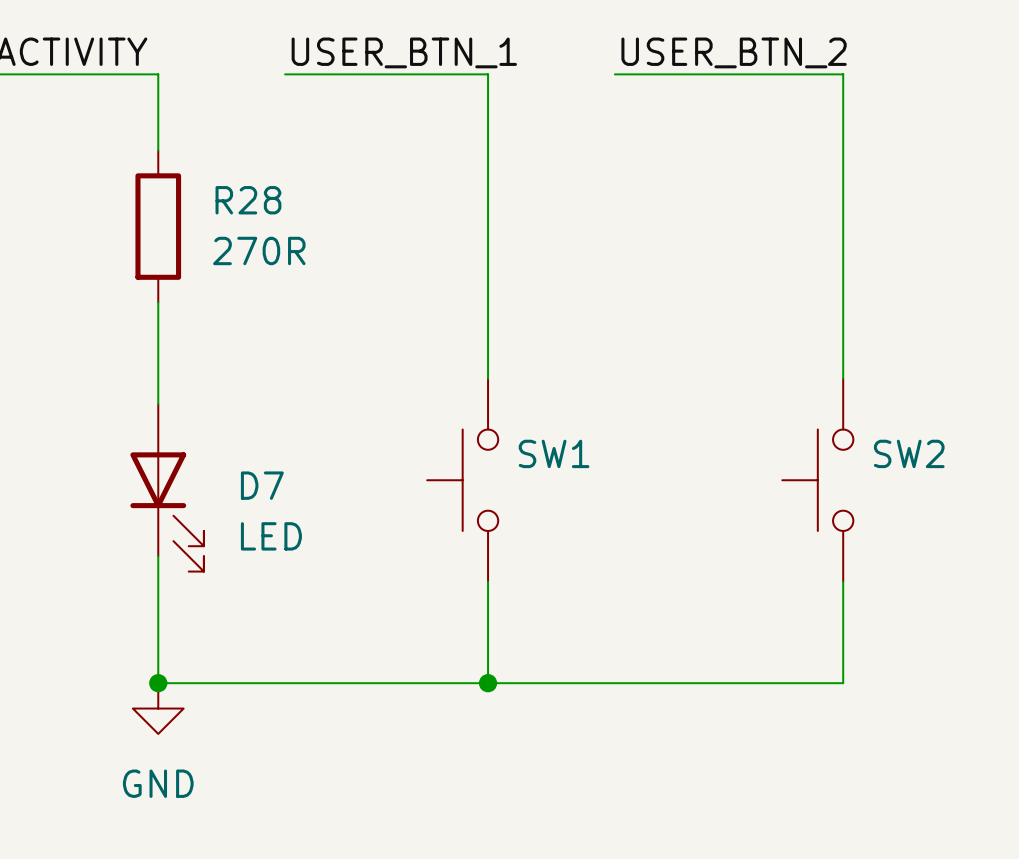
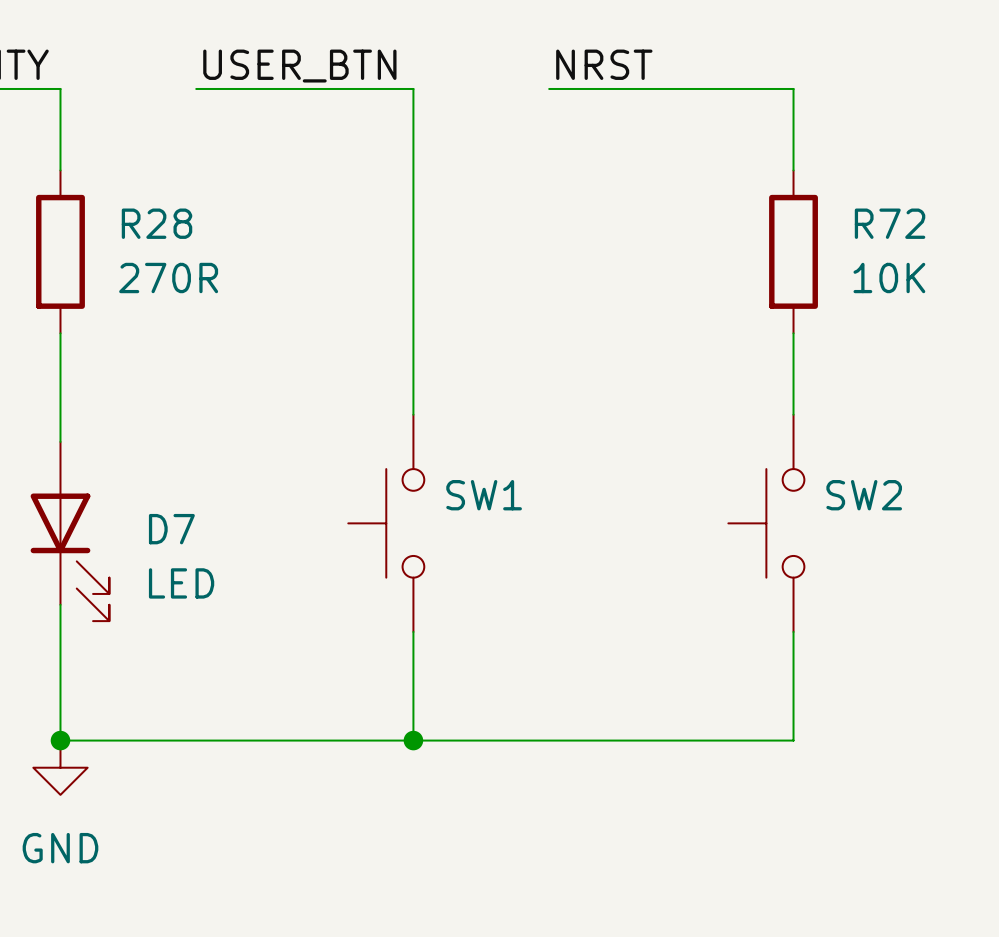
label: USER_BTN_1 (404, 52) -> USER_BTN (299, 66)
label: USER_BTN_2 (734, 52) -> NRST (604, 64)
wire: (843, 150) (843, 302) -> none
R72: none -> 10K (793, 251)

